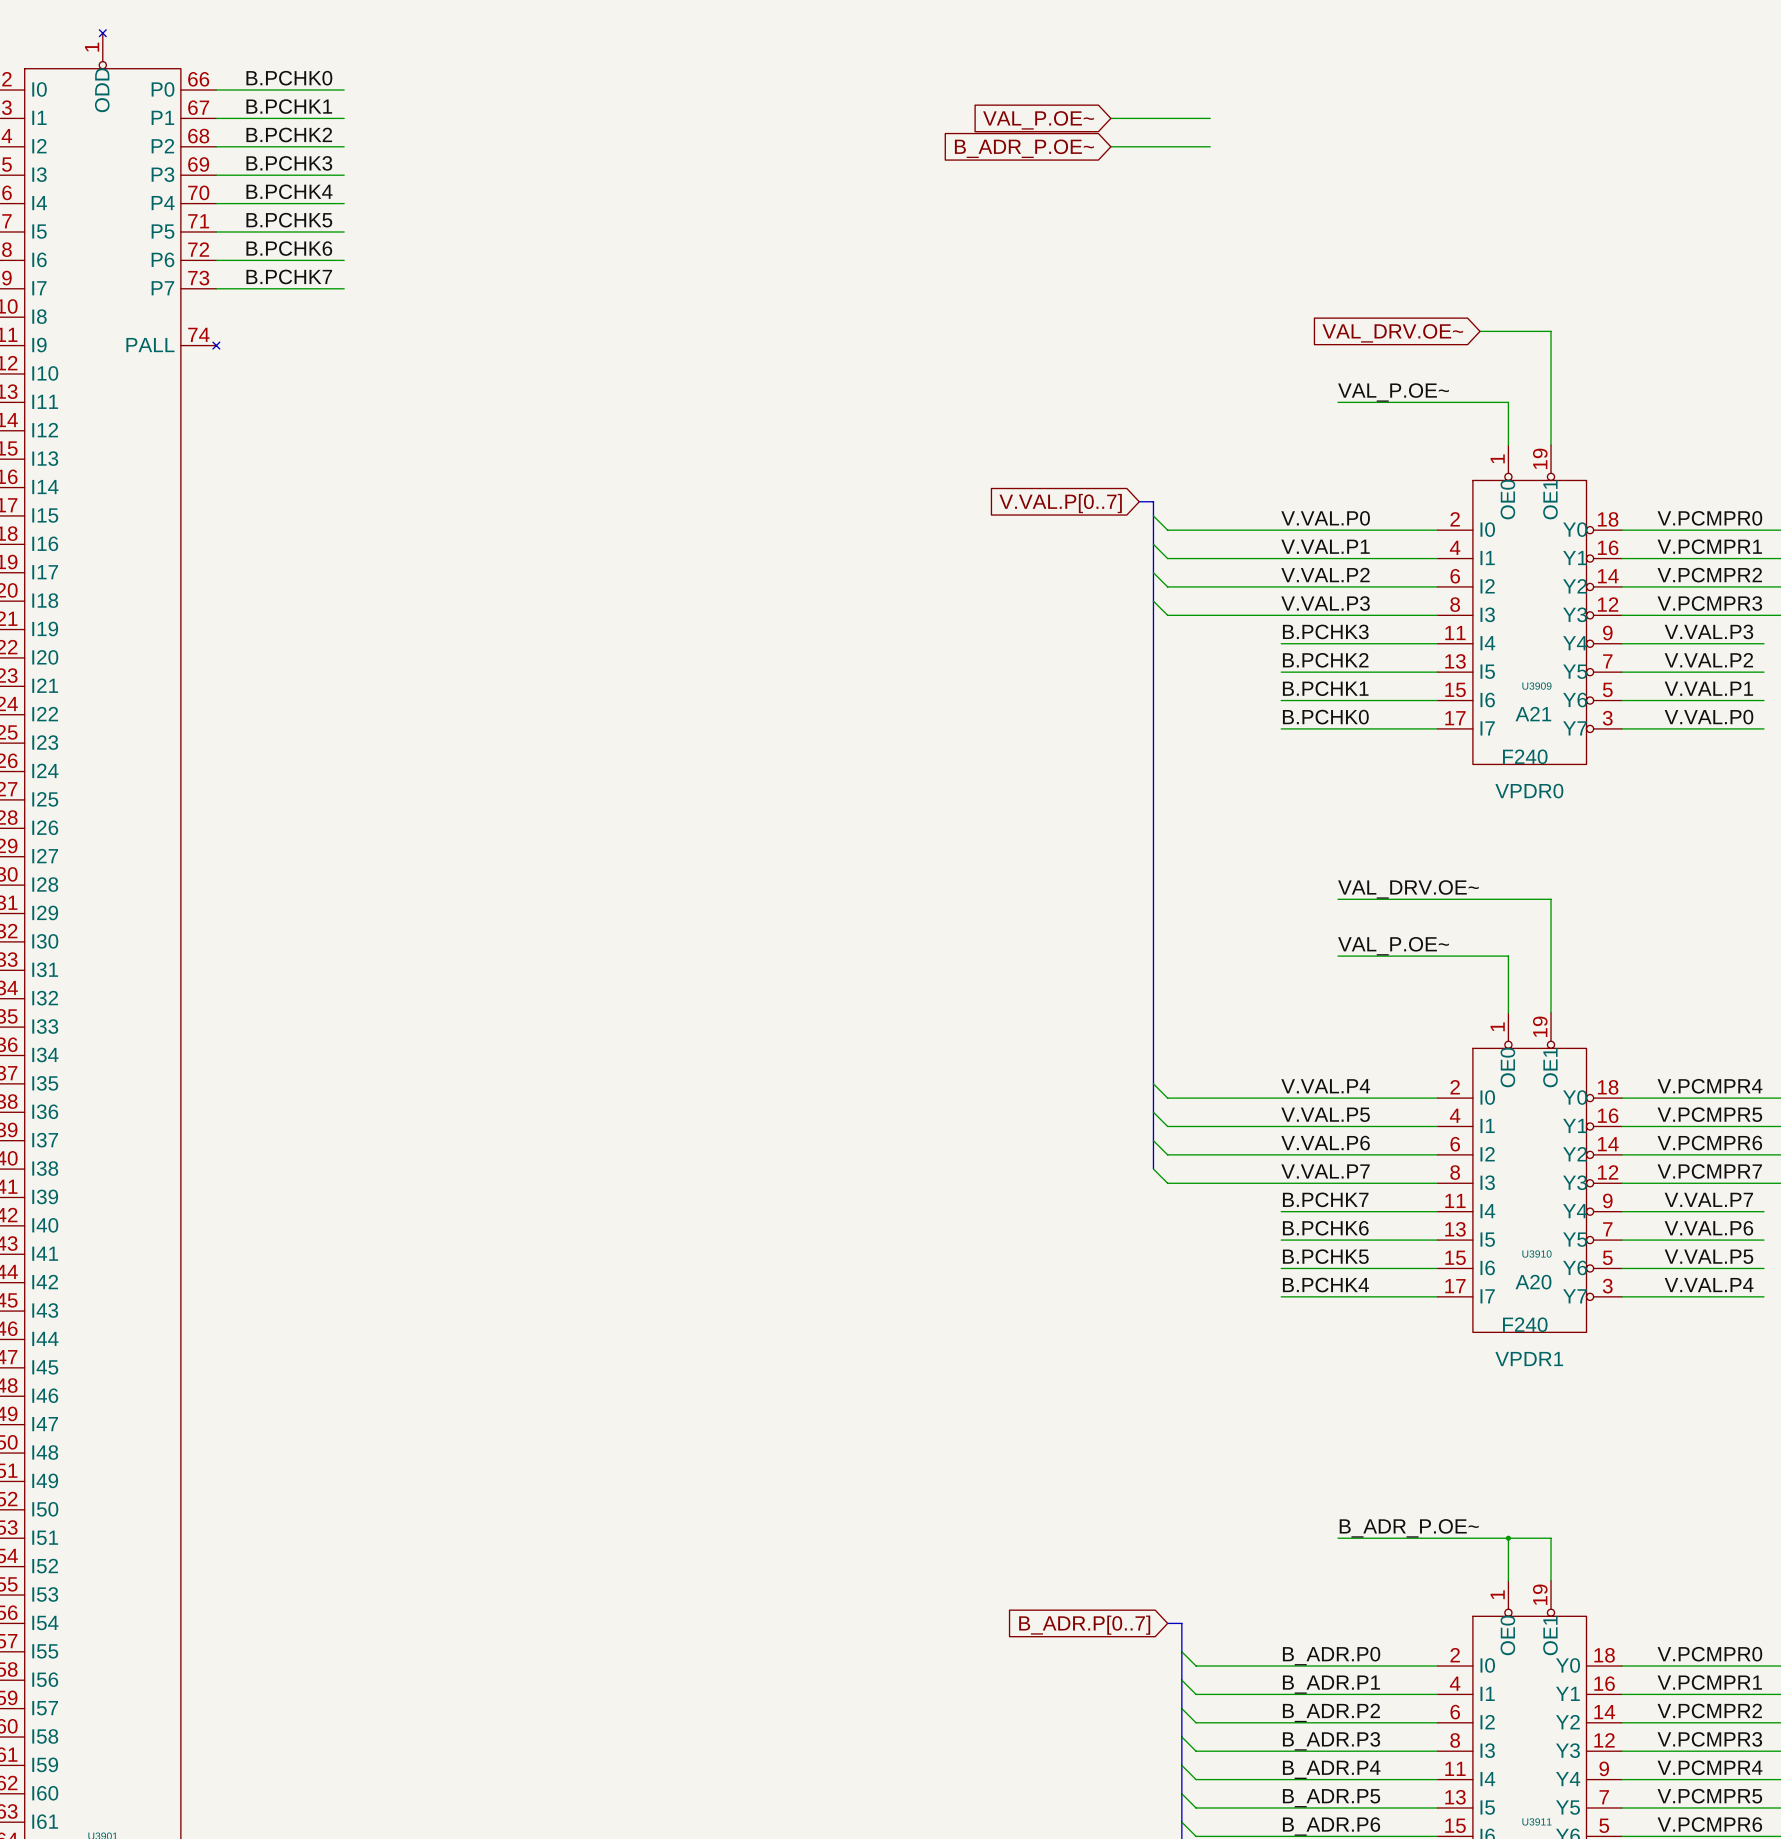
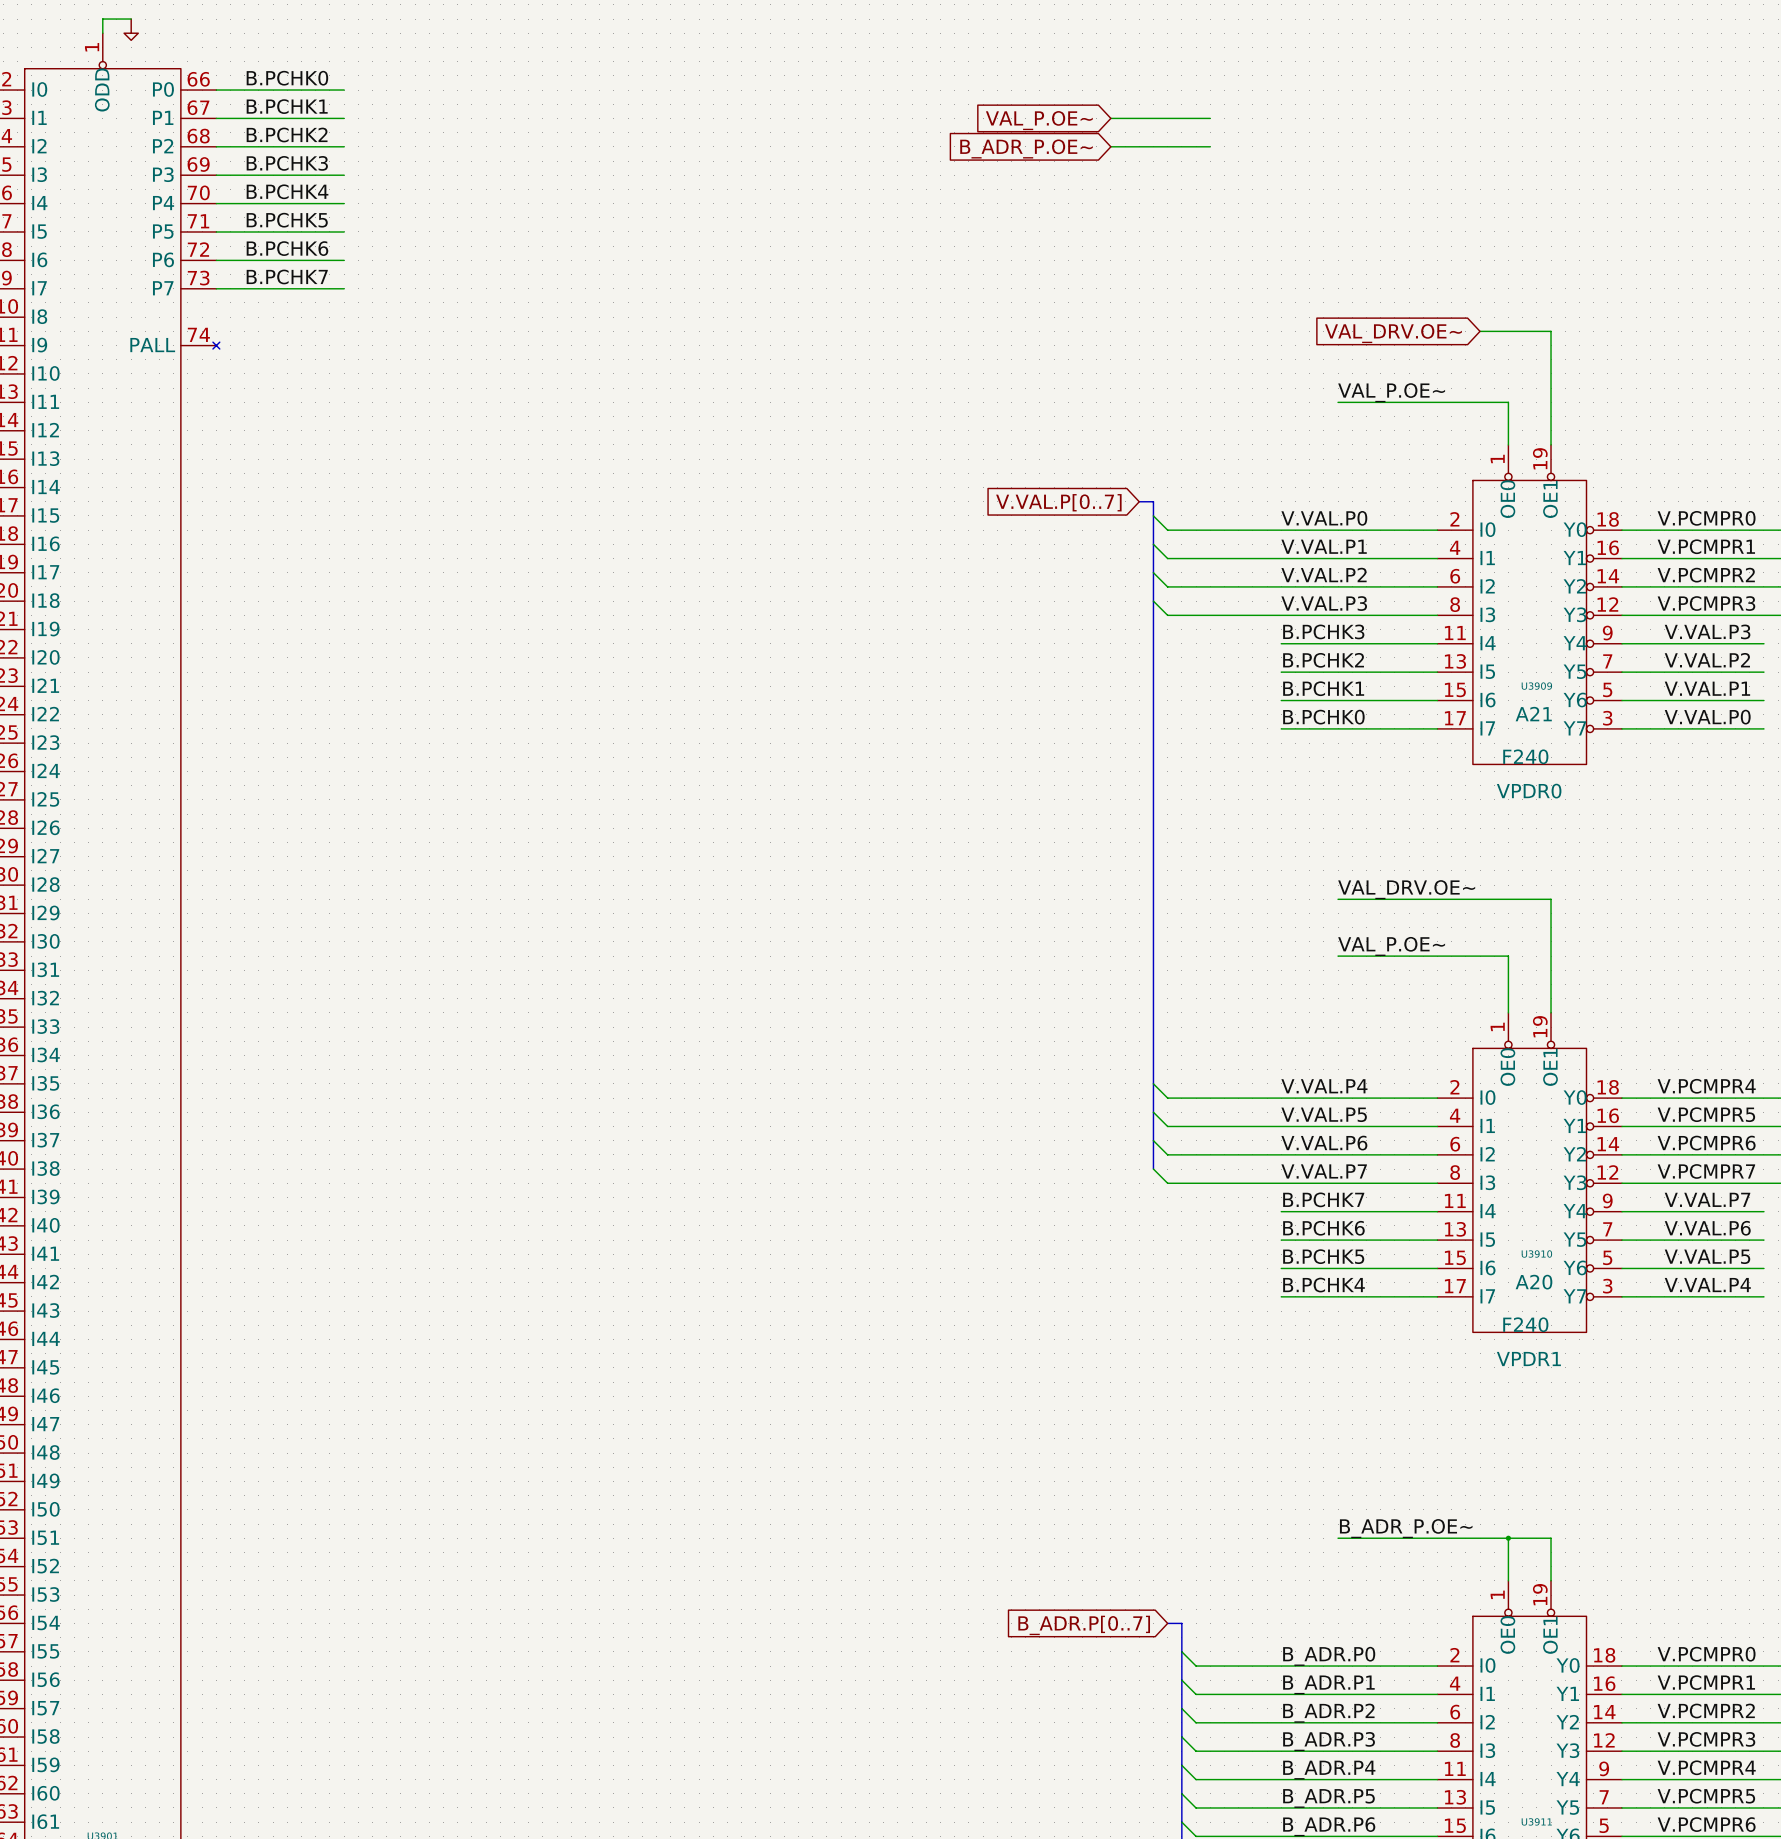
wire: none -> (131, 19) (102, 19) (102, 33)
power symbol: none -> (131, 29)
no-connect mark: (102, 33) -> none

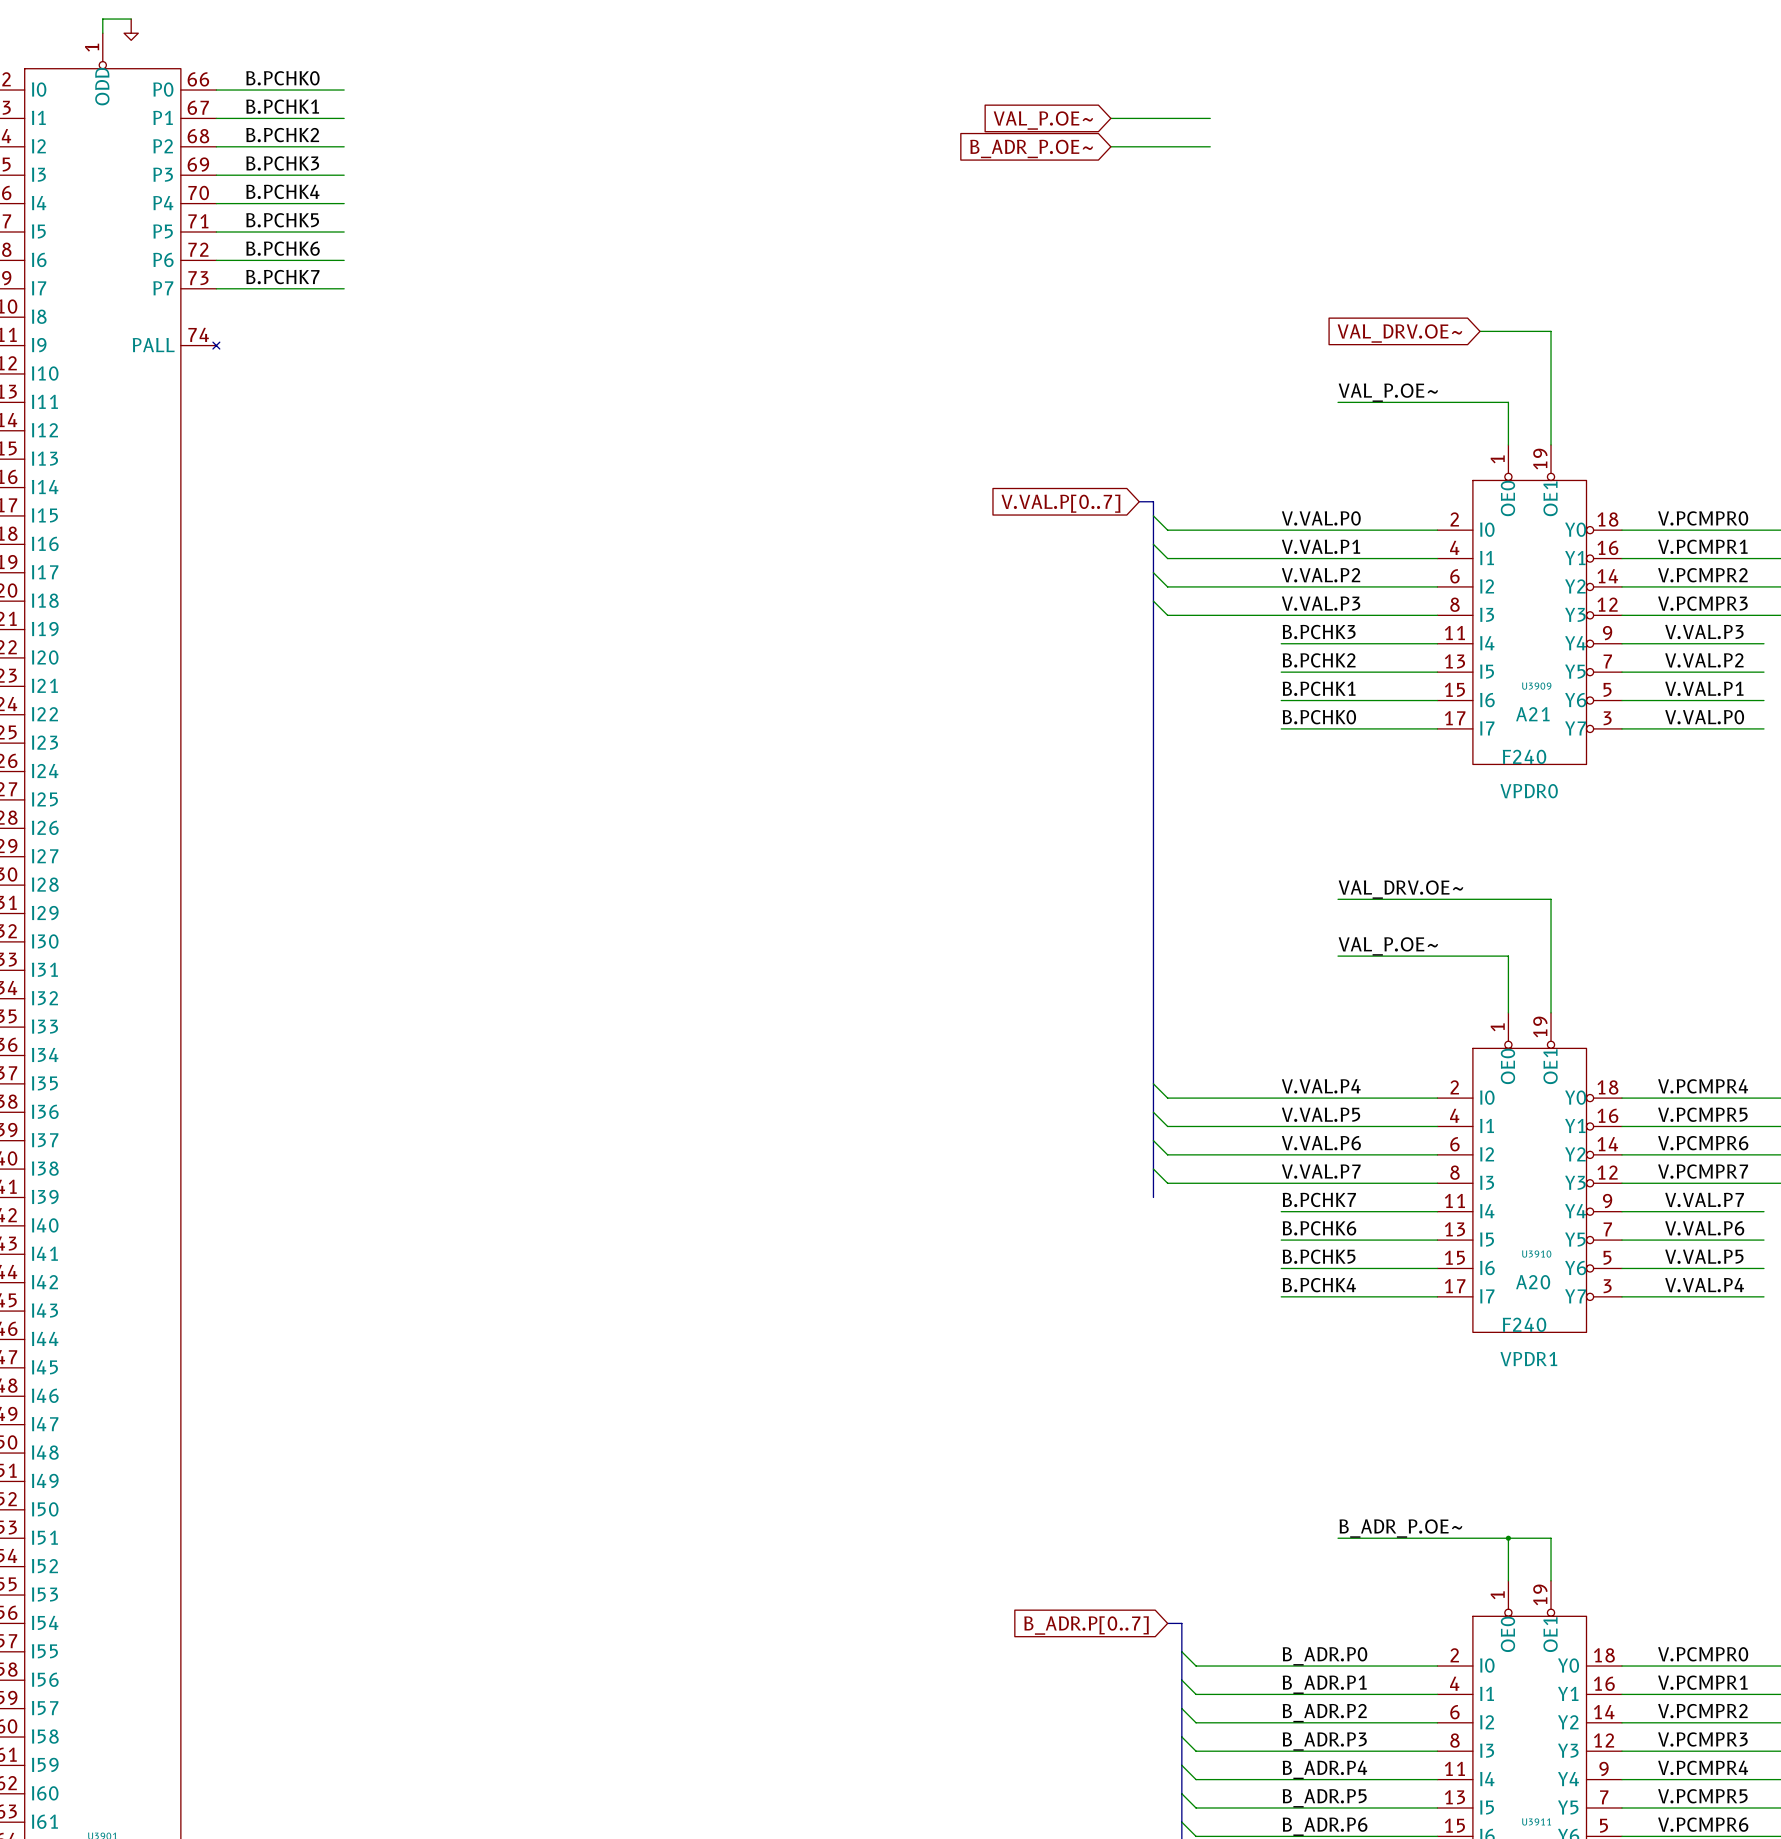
bus: none -> (1153, 1169) (1153, 1197)

